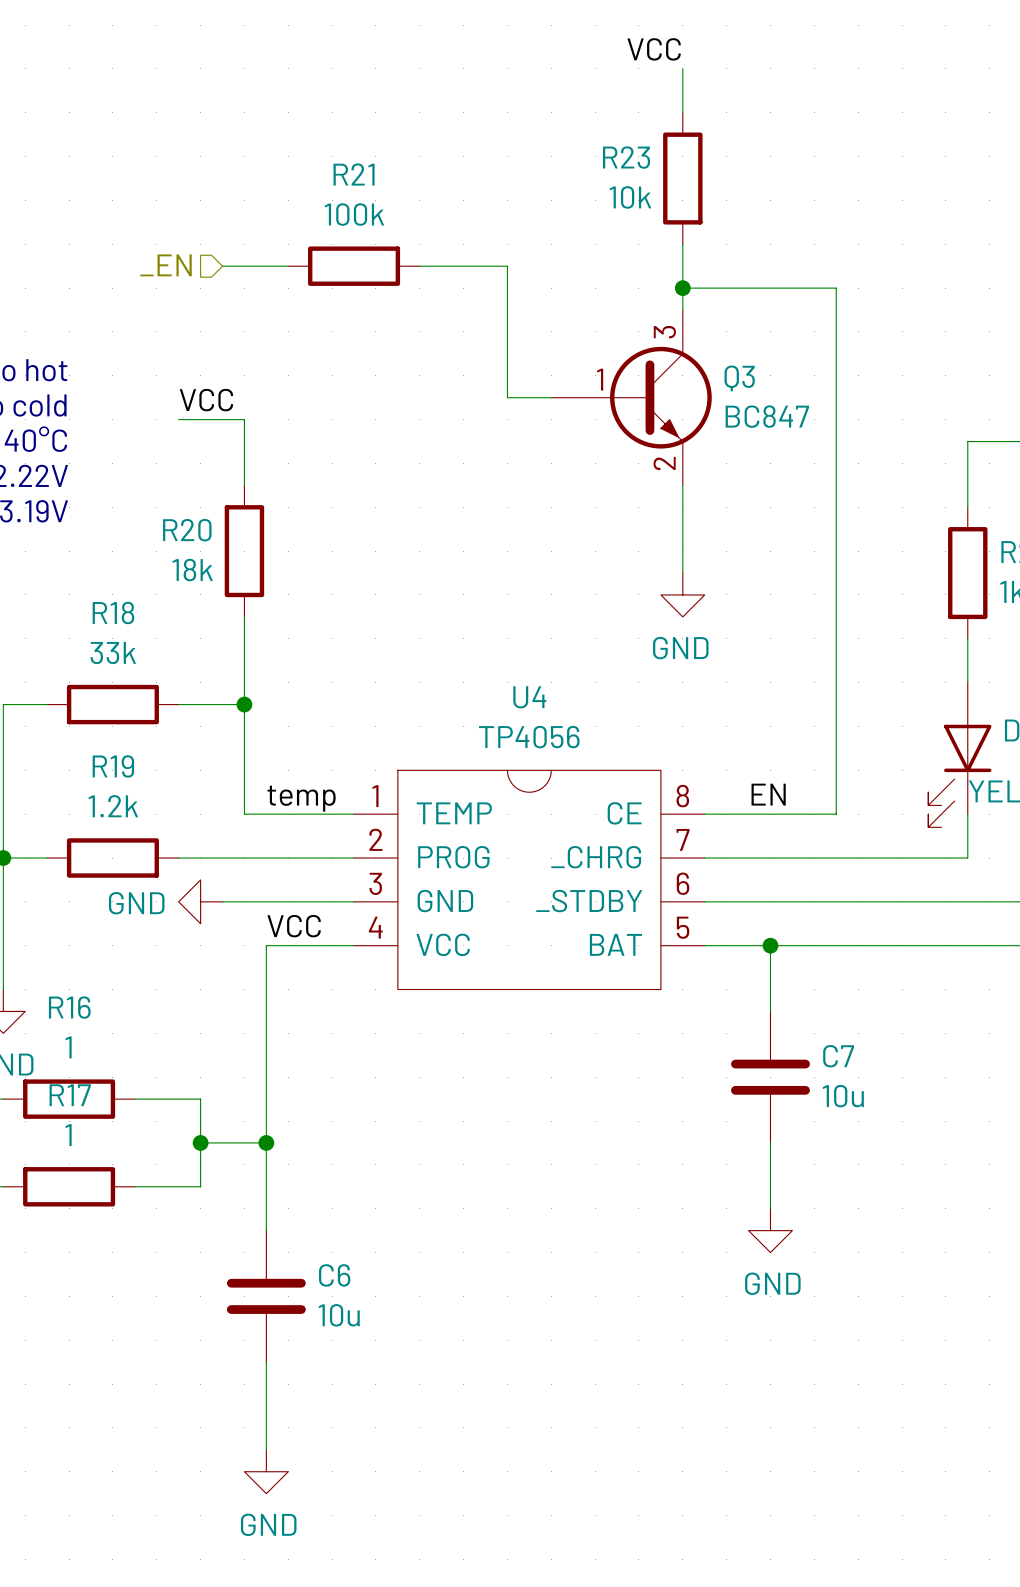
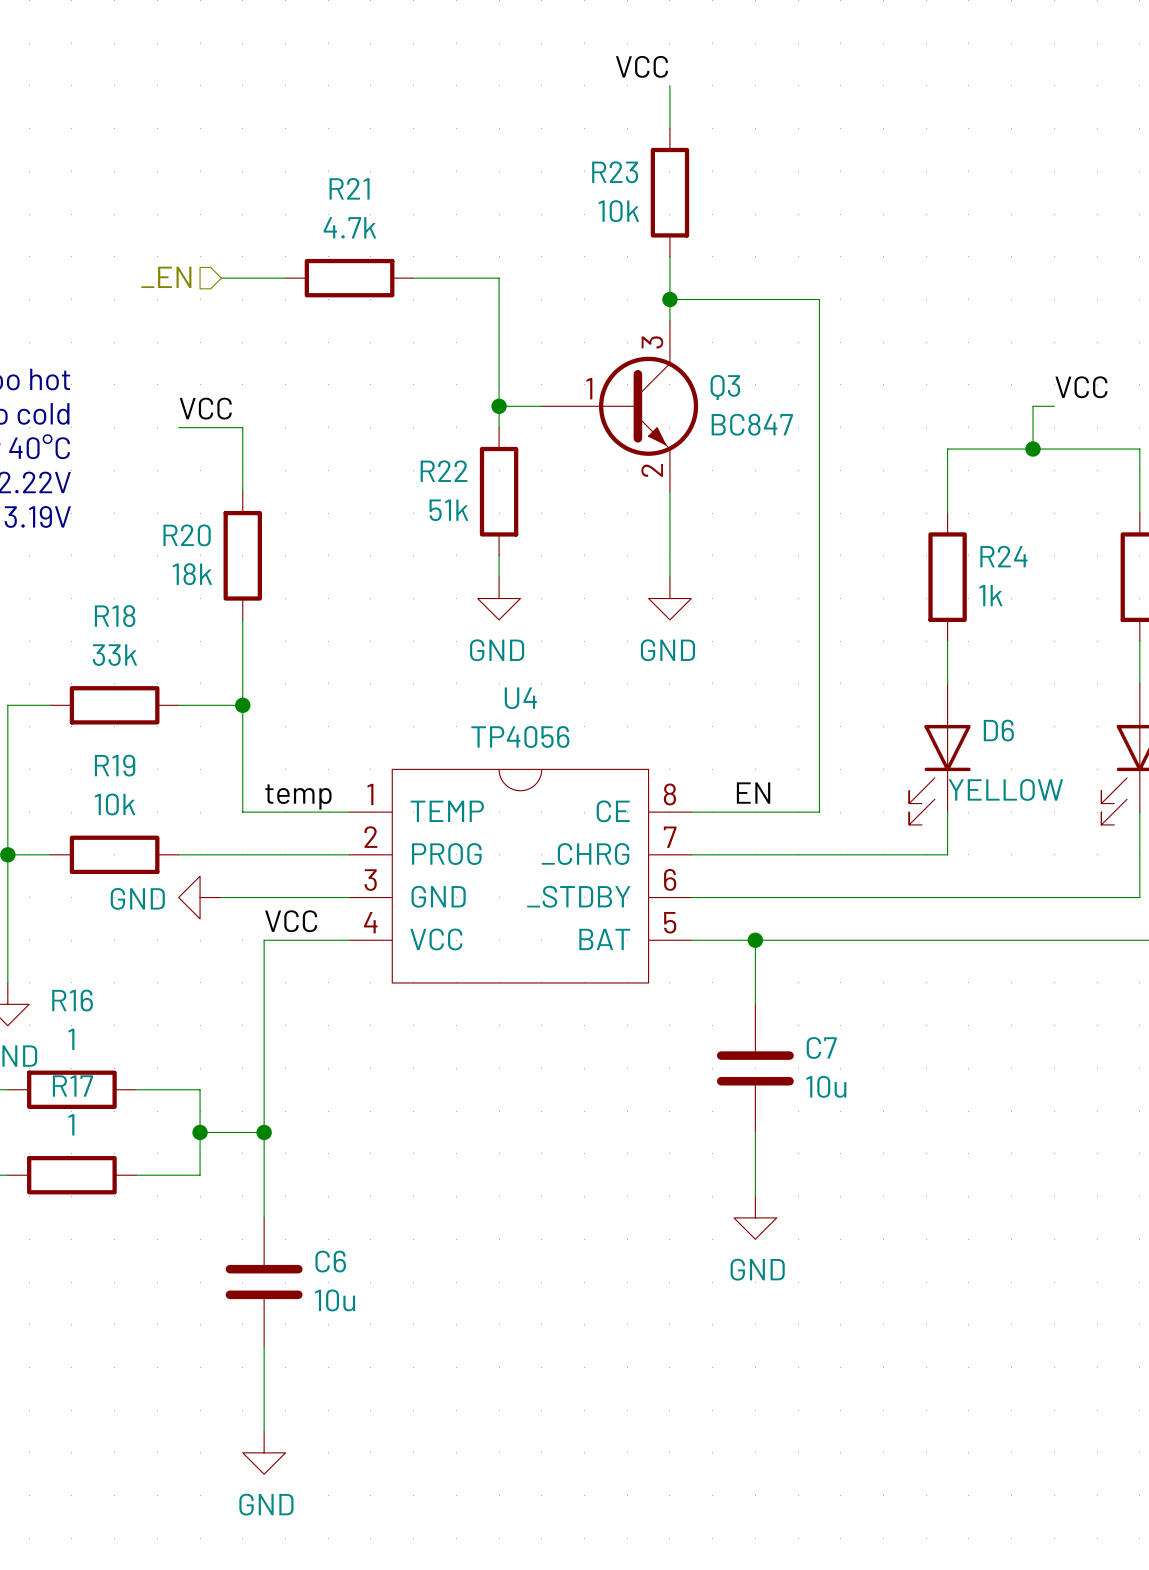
R21 value: 100k (354, 214) -> 4.7k (349, 227)
wire: none -> (499, 406) (499, 427)
junction: none -> (499, 406)
R22: none -> 51k (499, 491)
wire: none -> (499, 555) (499, 577)
power symbol: none -> GND (499, 598)
R19 value: 1.2k (113, 806) -> 10k (115, 804)

